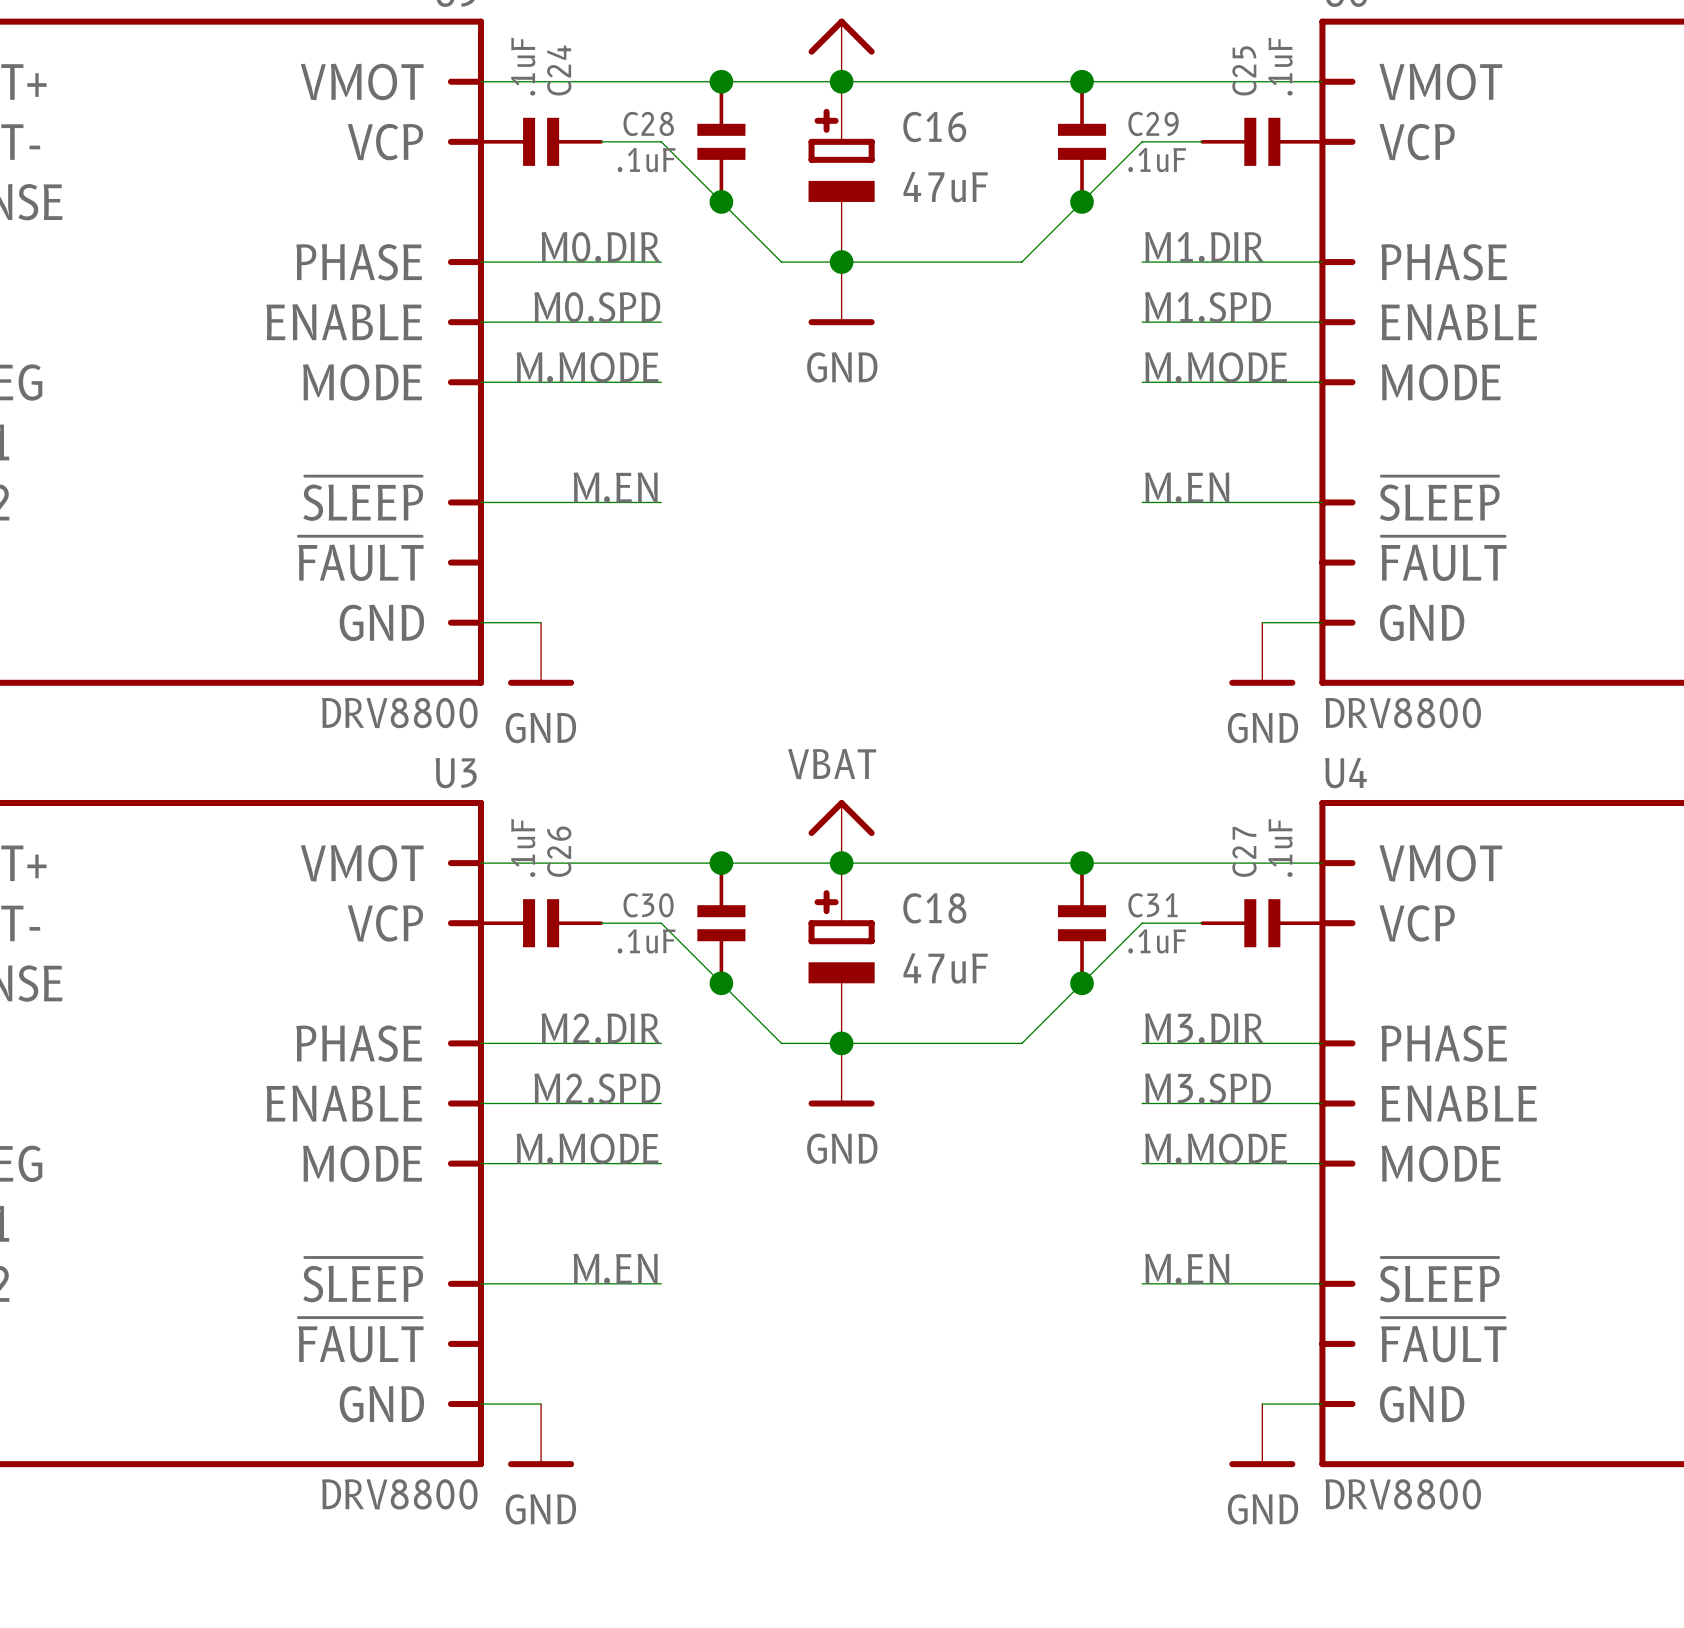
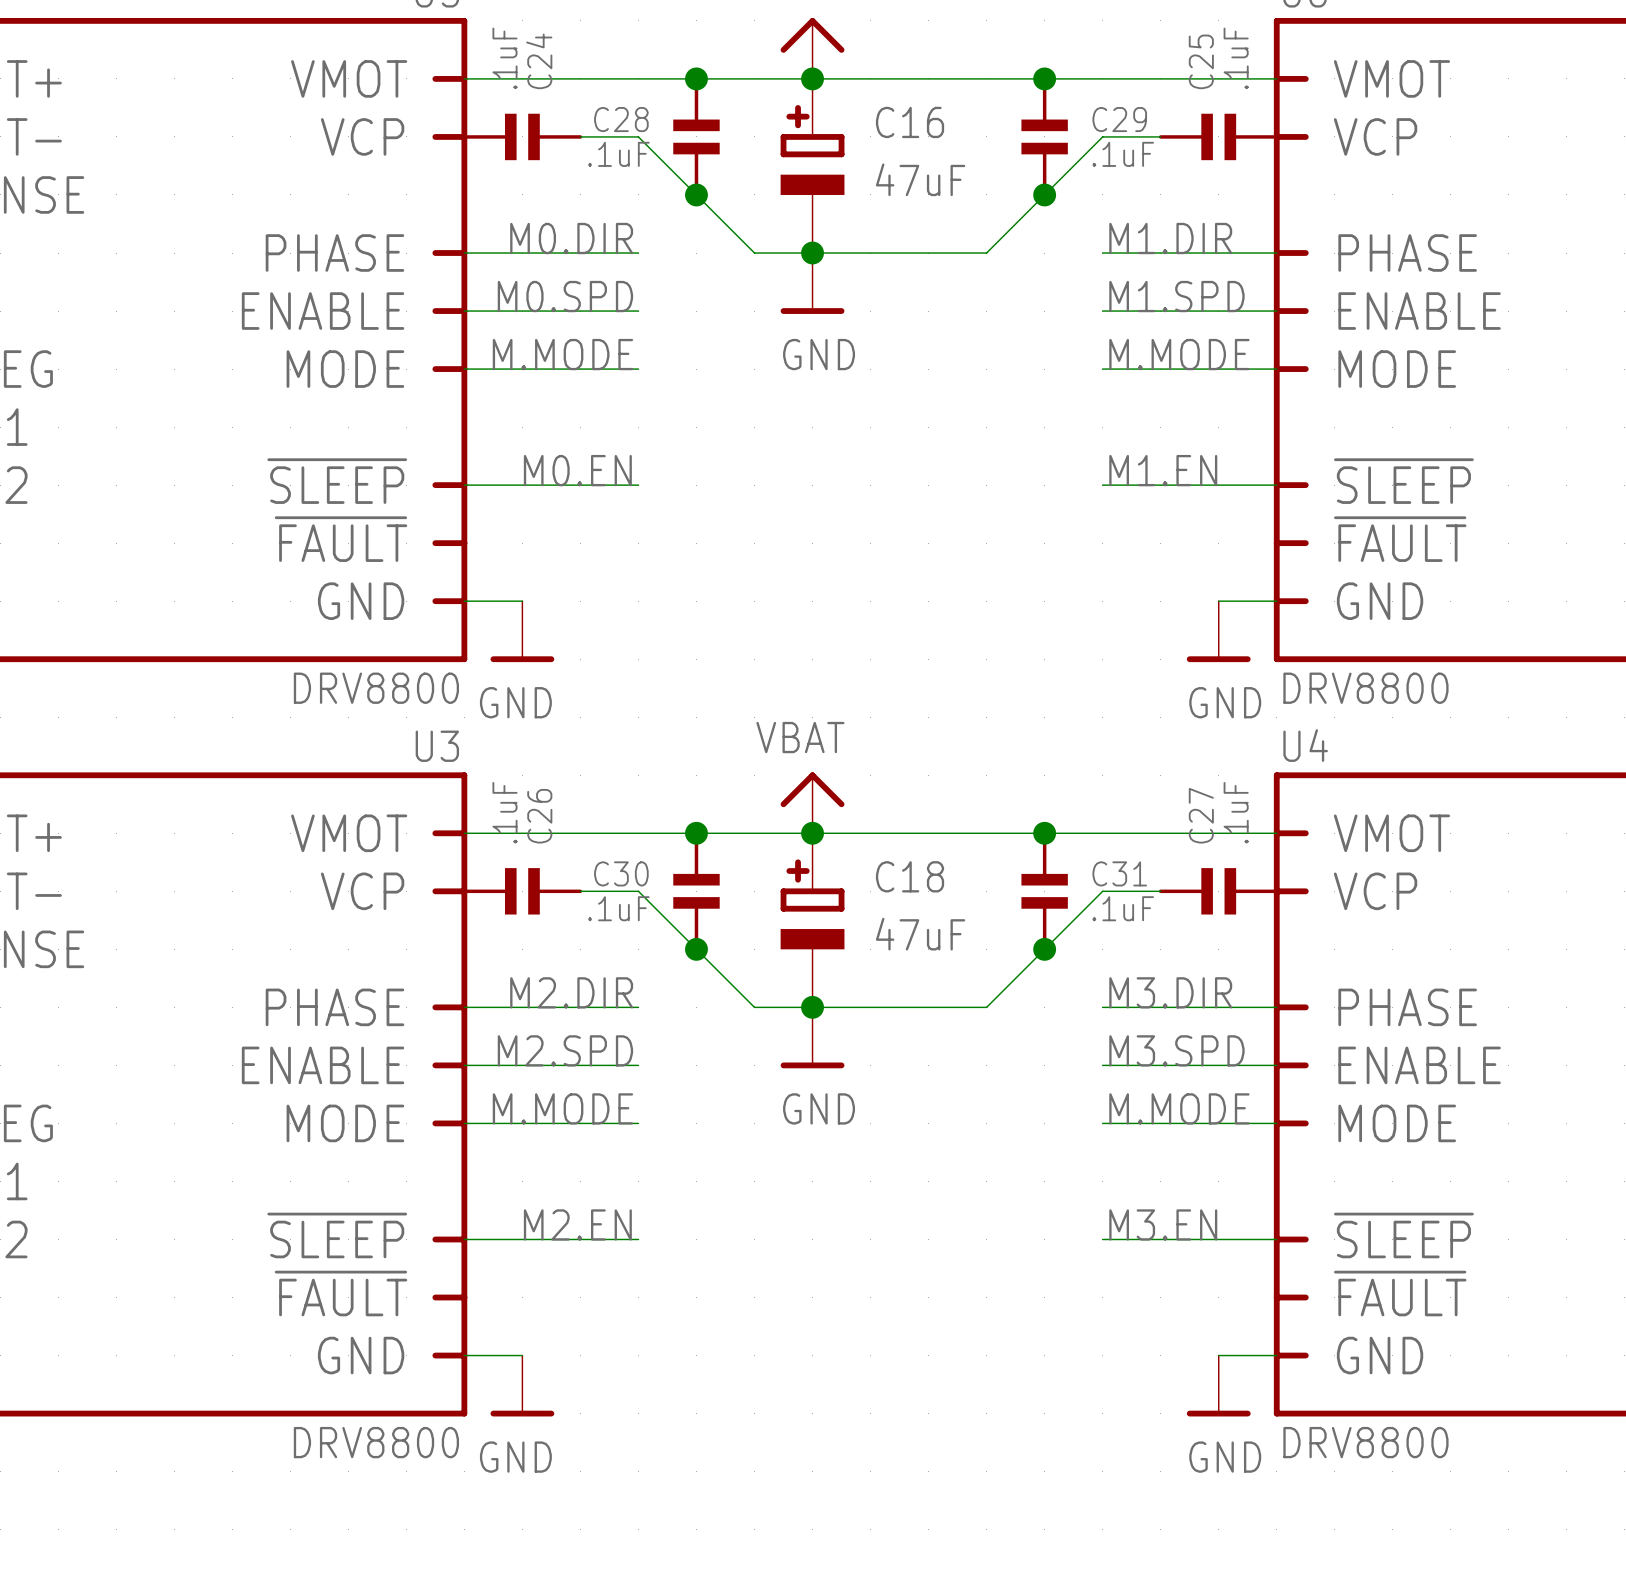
label: M.EN (615, 487) -> M0.EN (577, 470)
label: M.EN (1187, 487) -> M1.EN (1163, 470)
label: M.EN (615, 1268) -> M2.EN (577, 1224)
label: M.EN (1187, 1268) -> M3.EN (1163, 1224)

